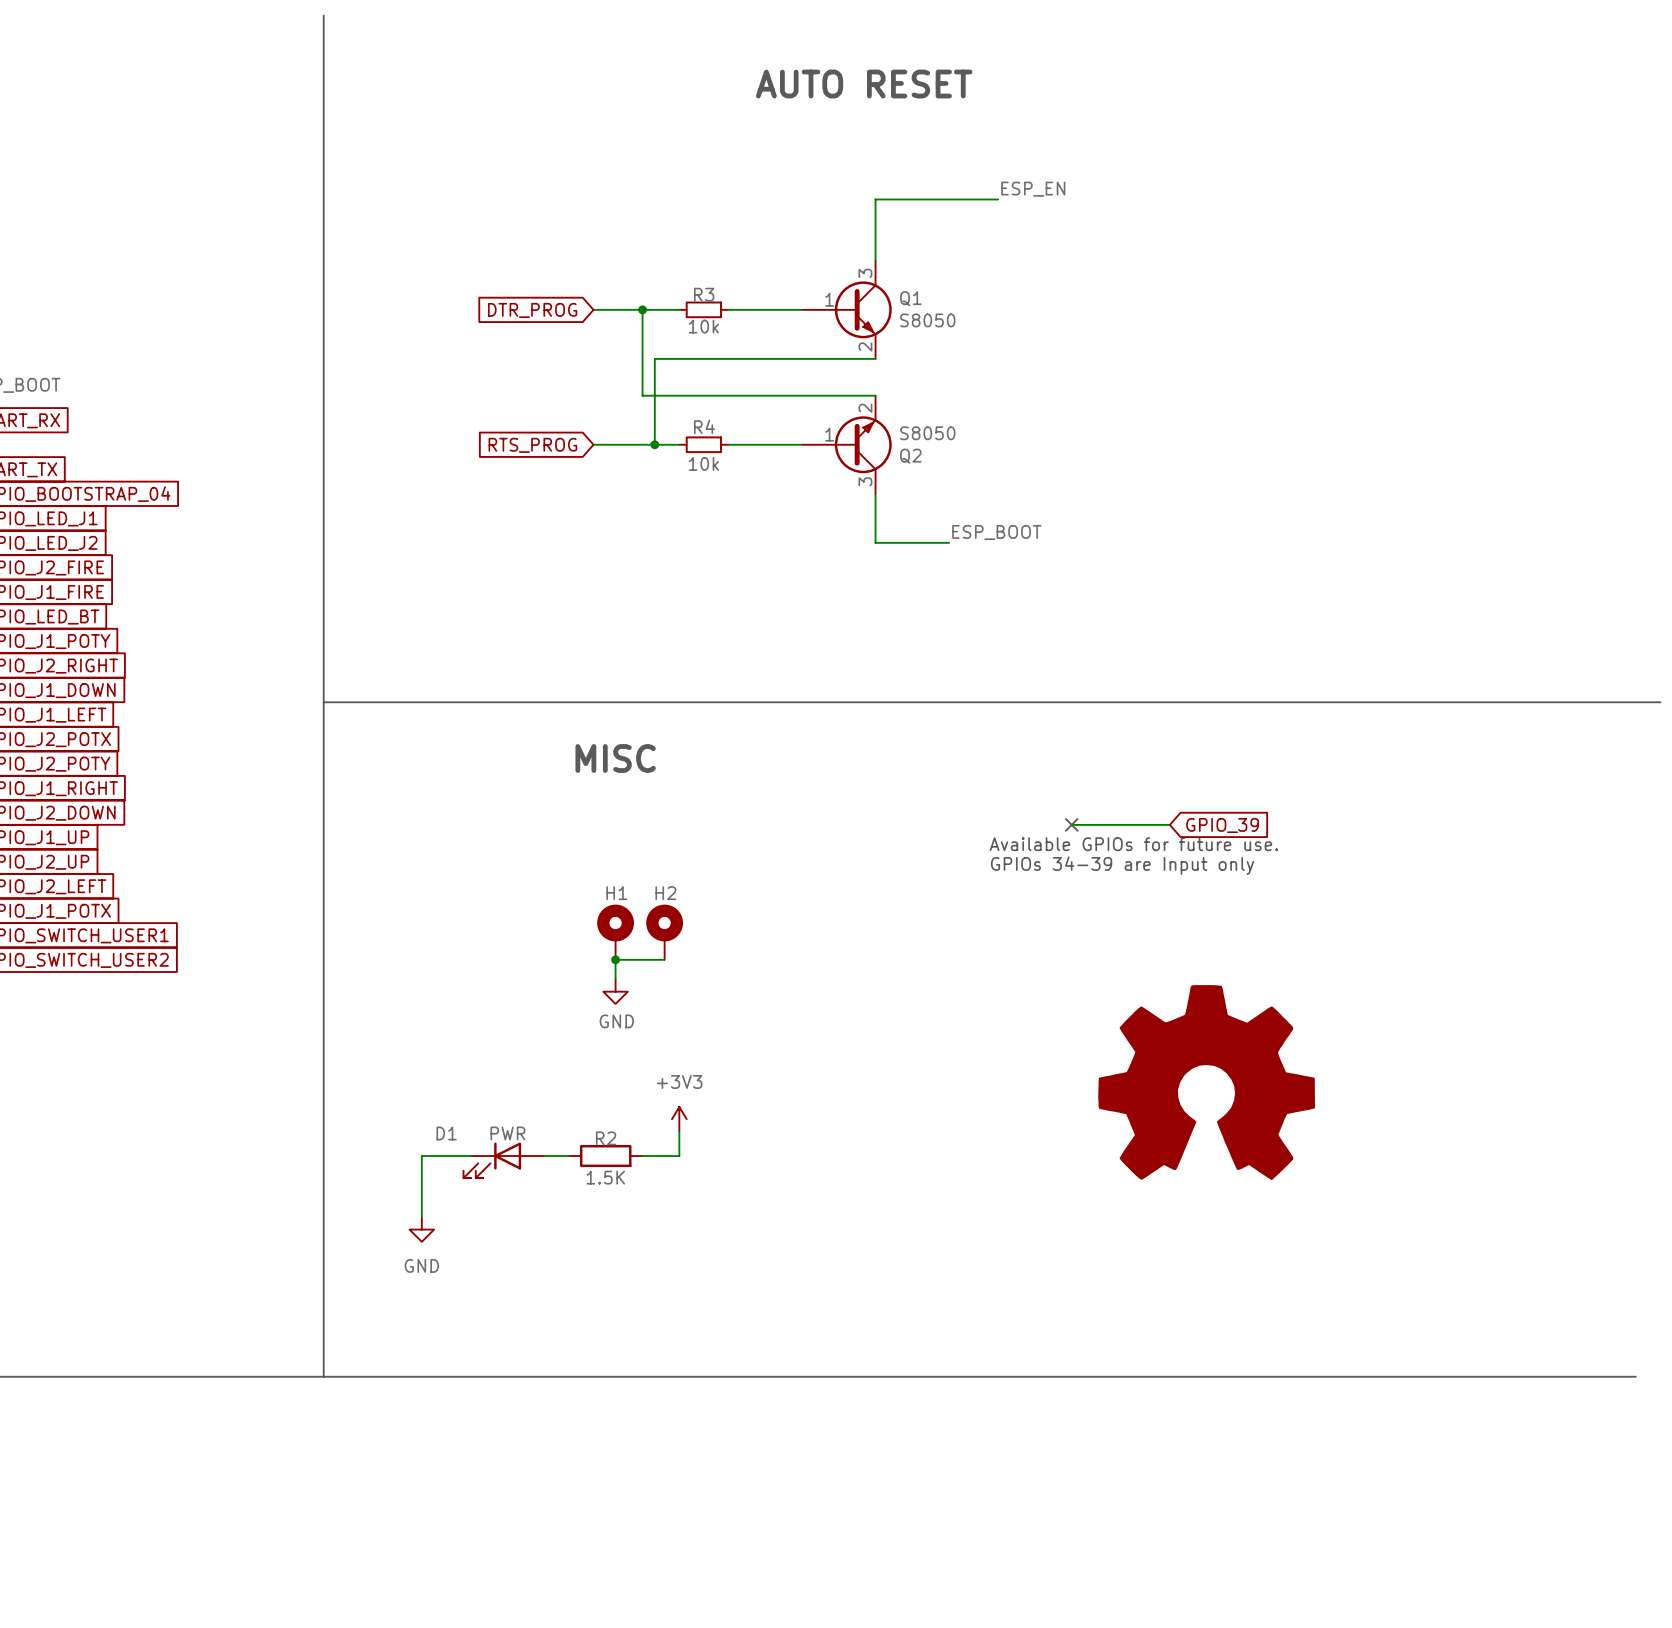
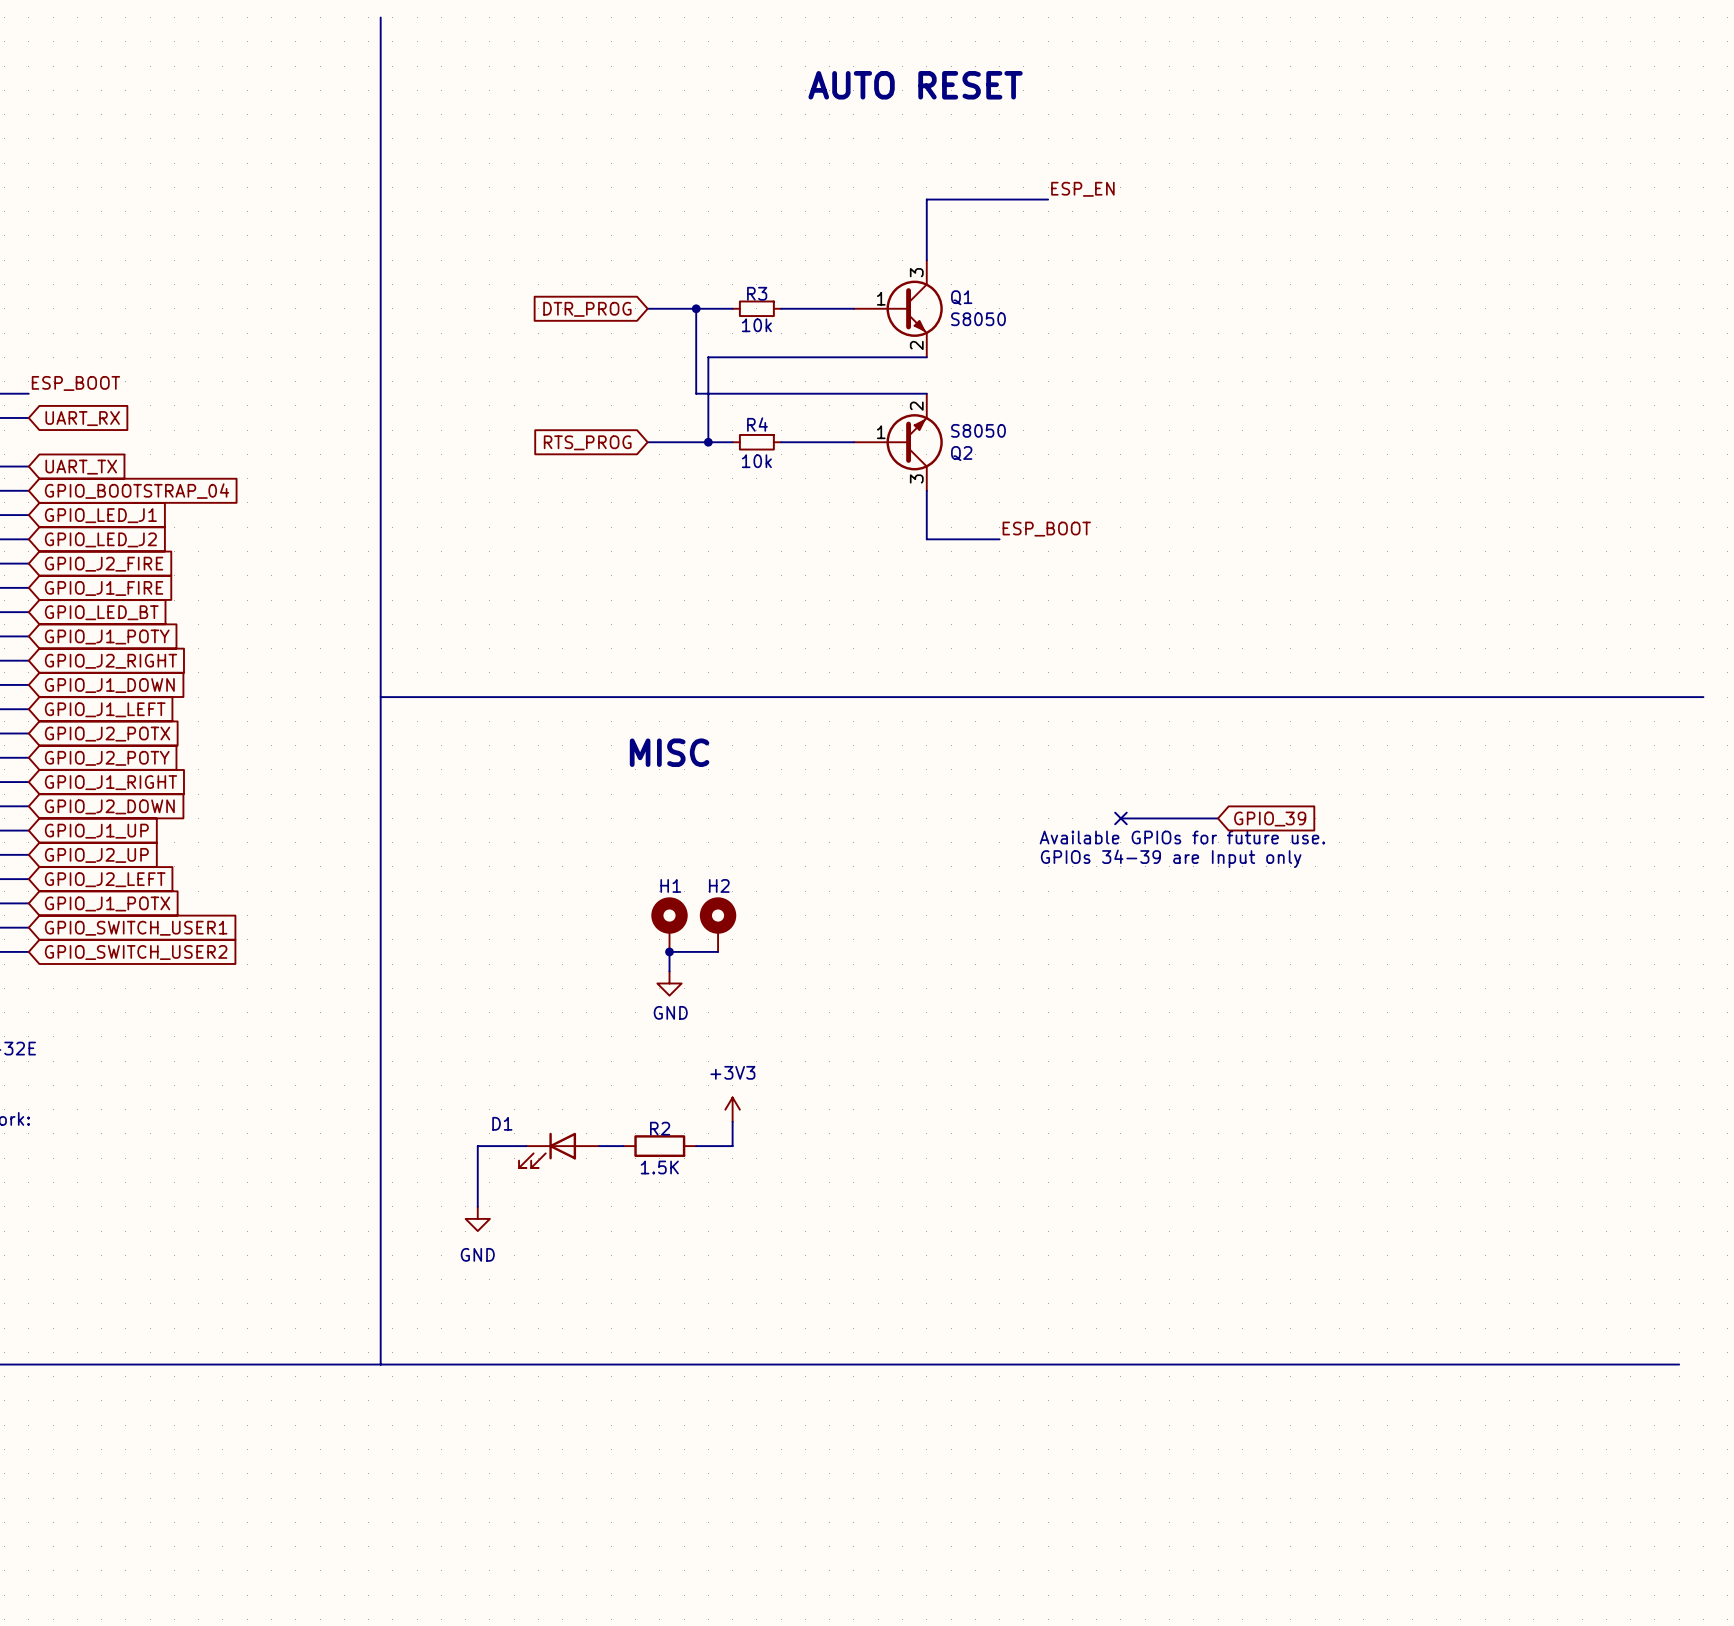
power symbol: (1206, 1082) -> none
D1 value: PWR (507, 1133) -> none

